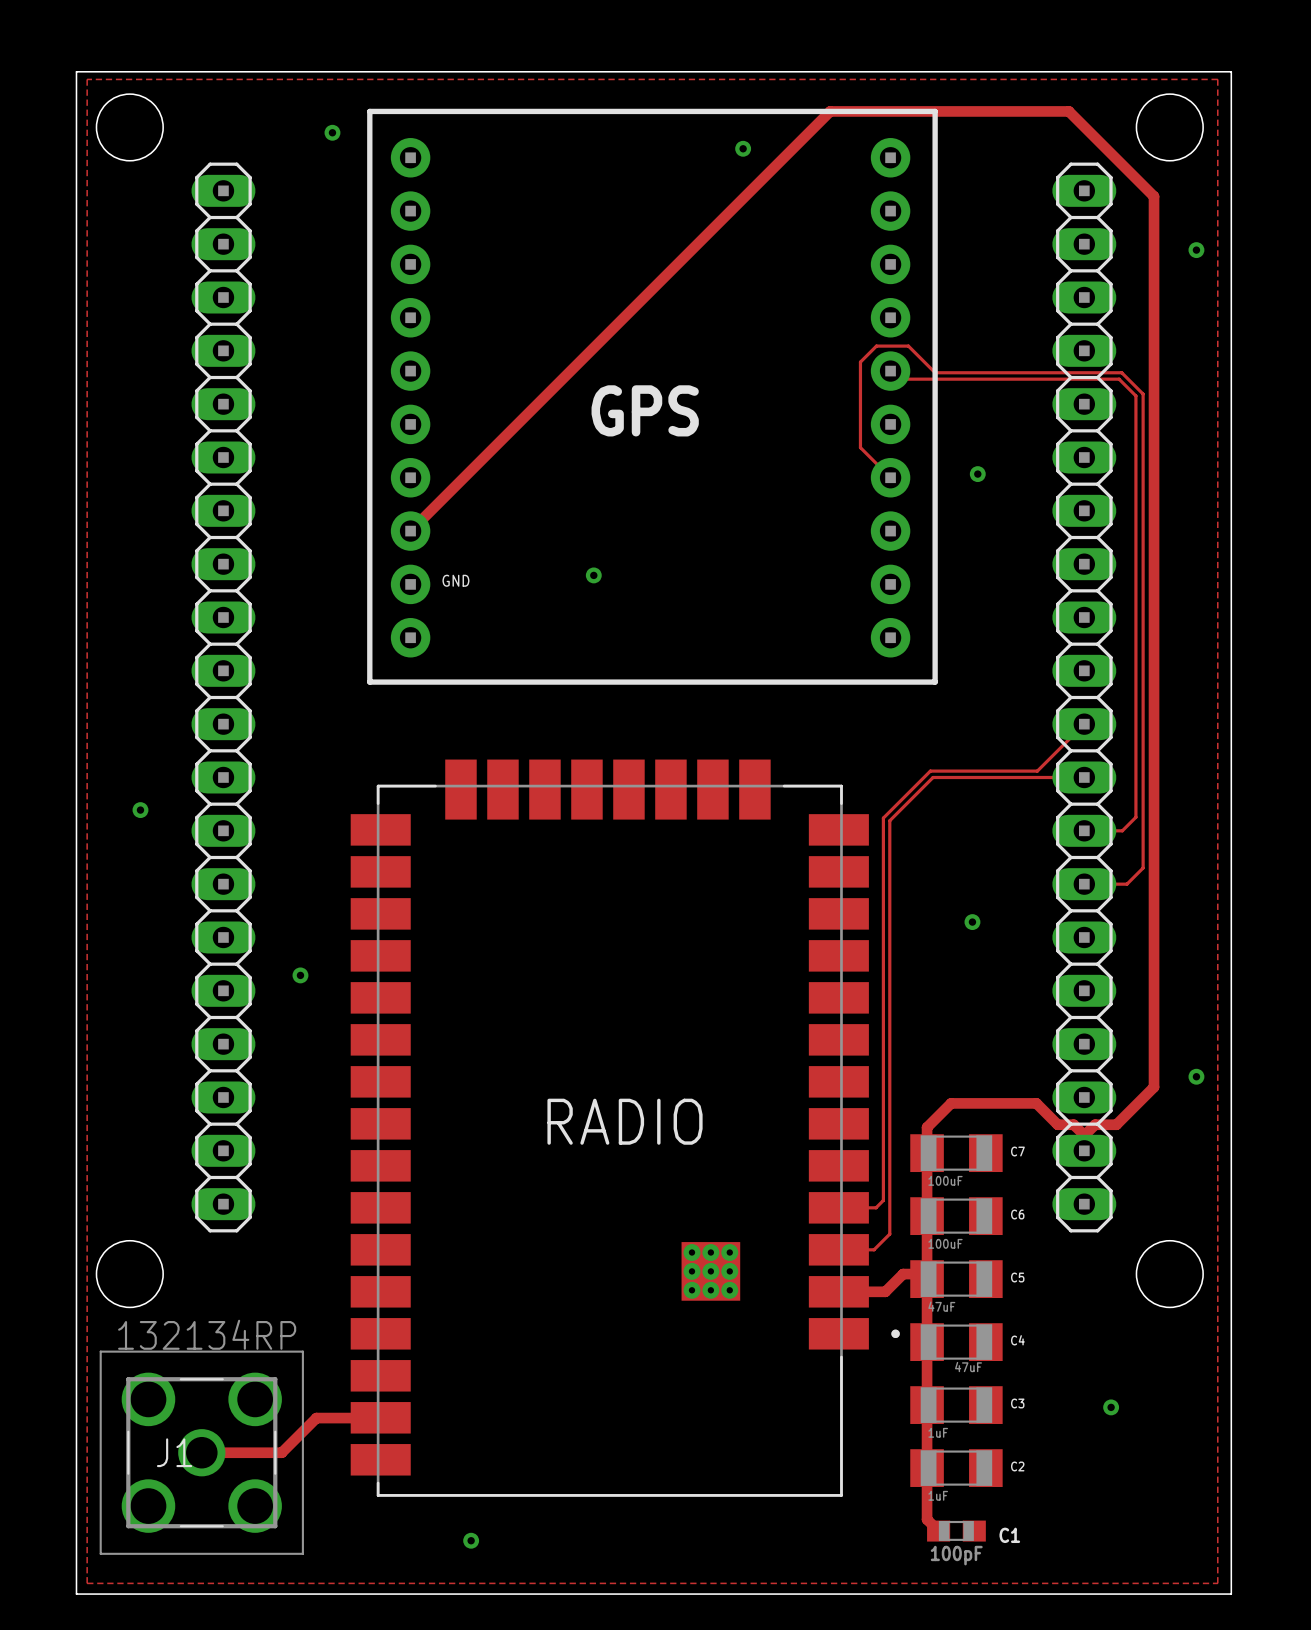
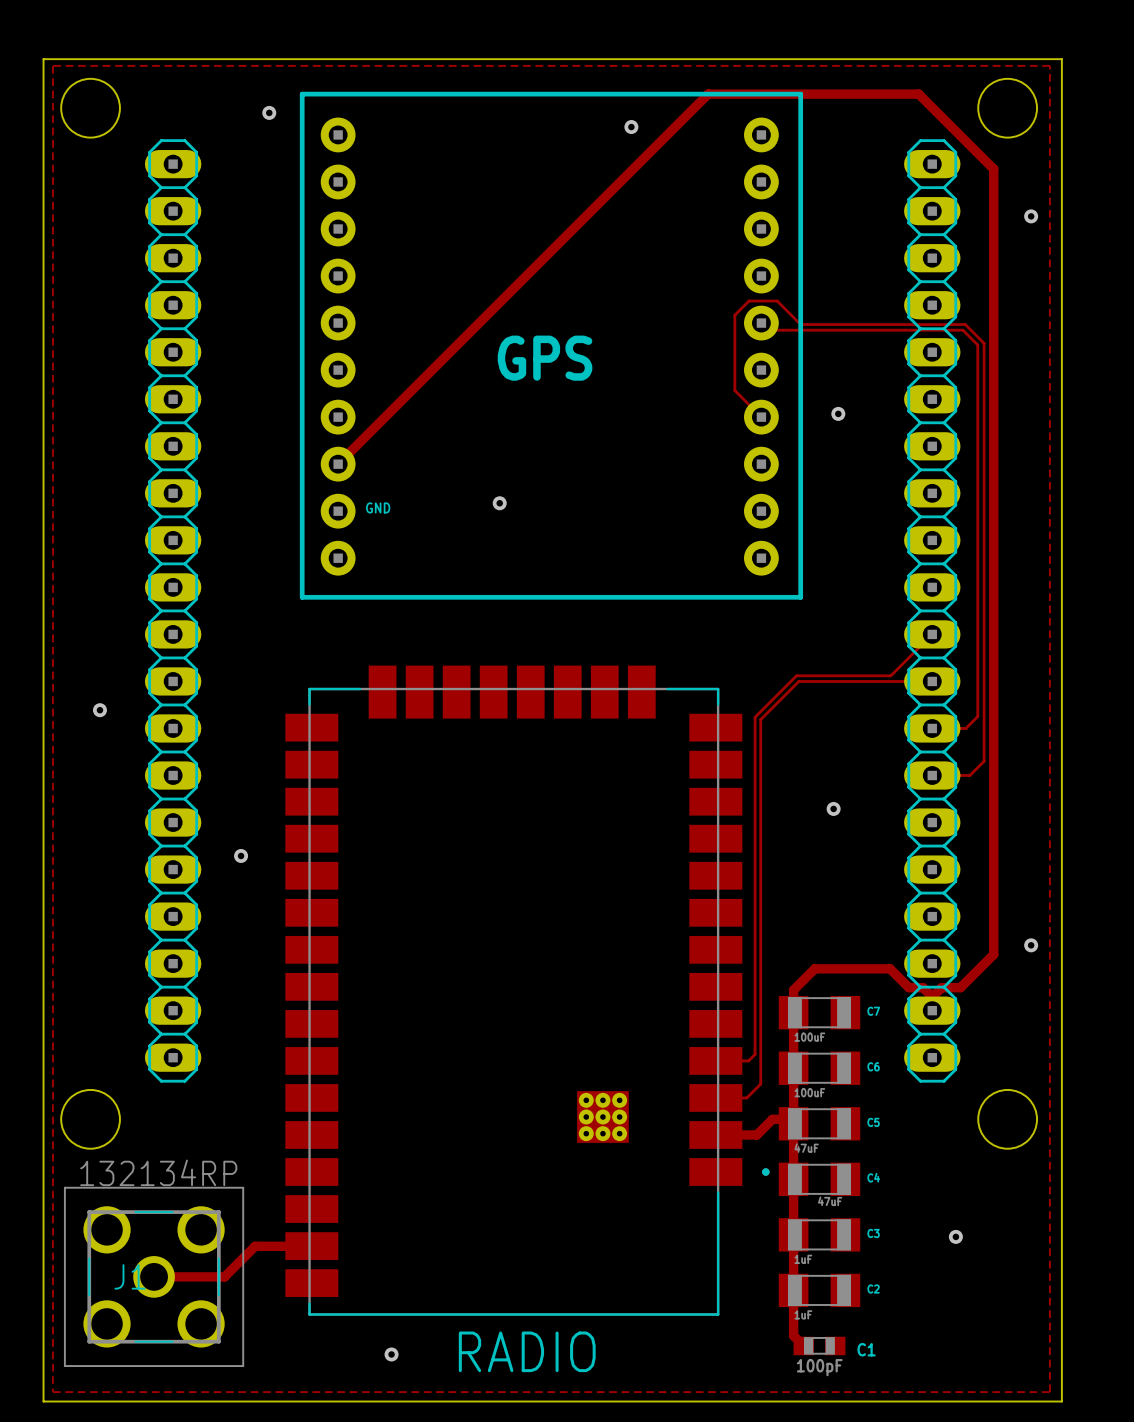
RADIO name position: RADIO (625, 1121) -> RADIO (527, 1351)

